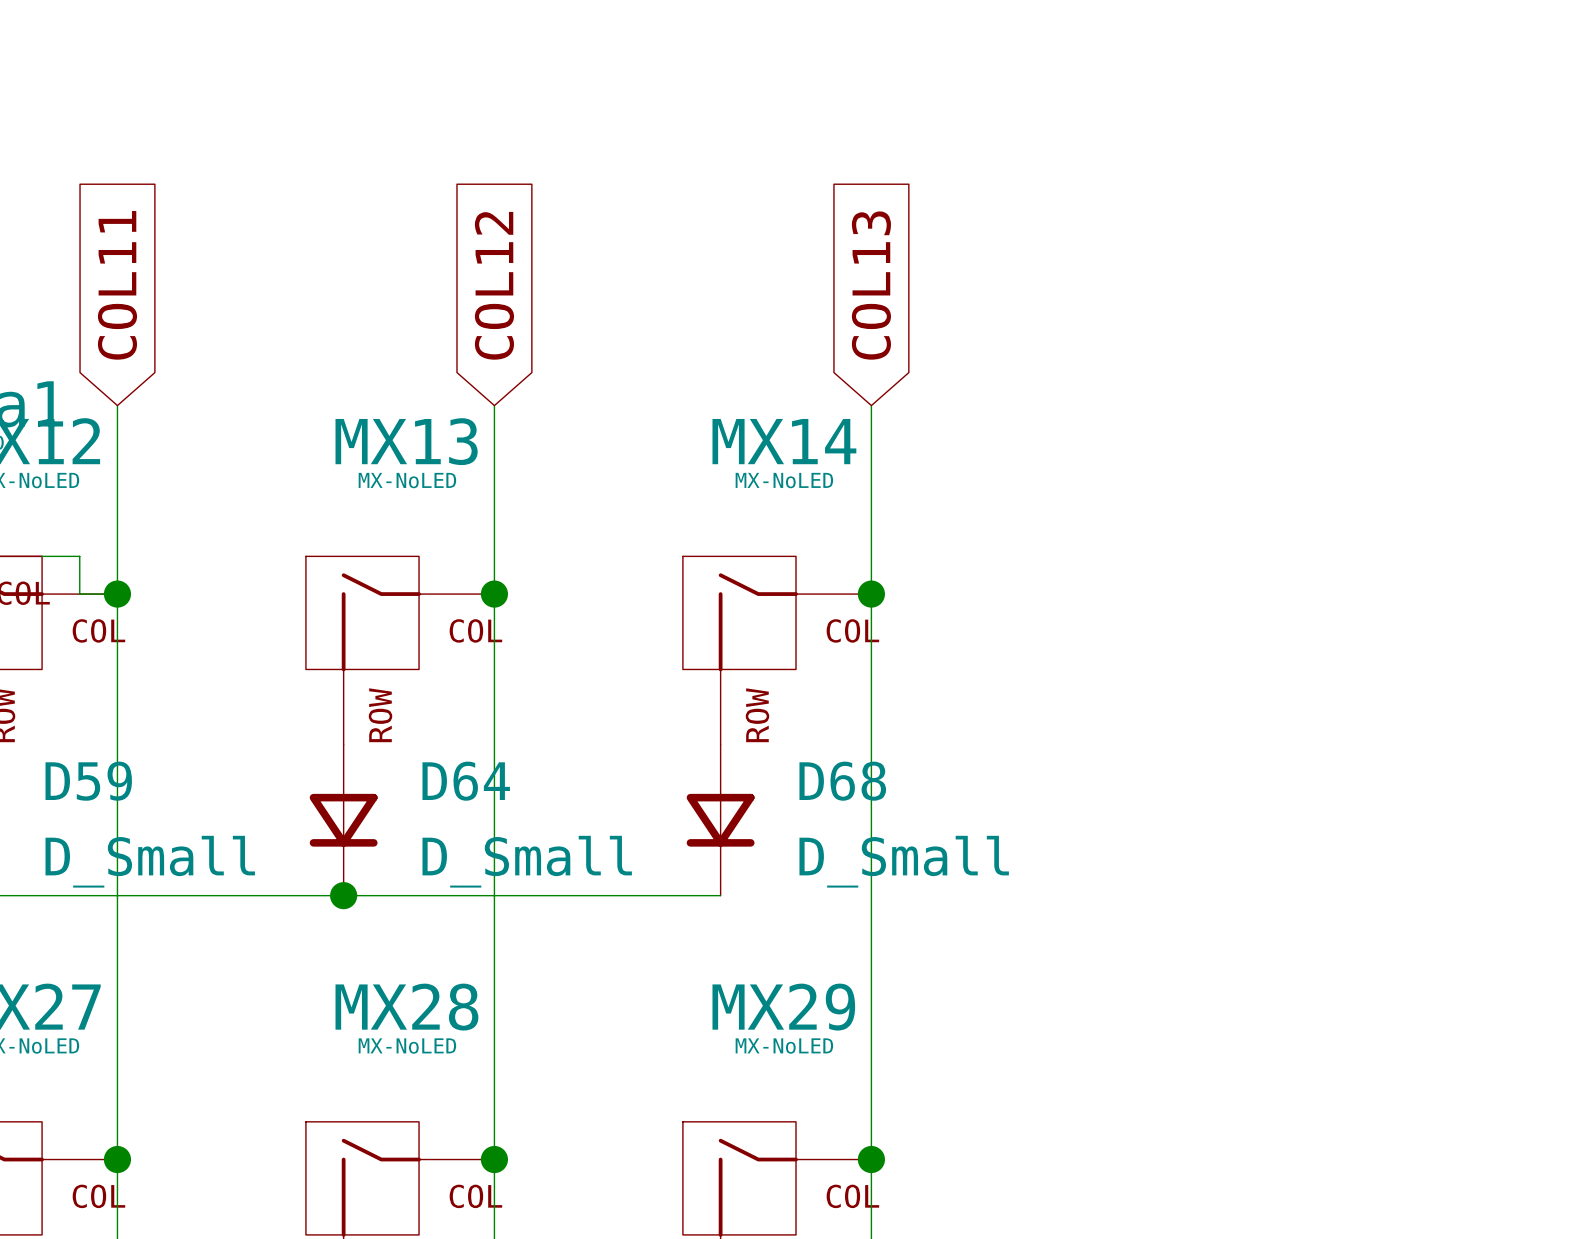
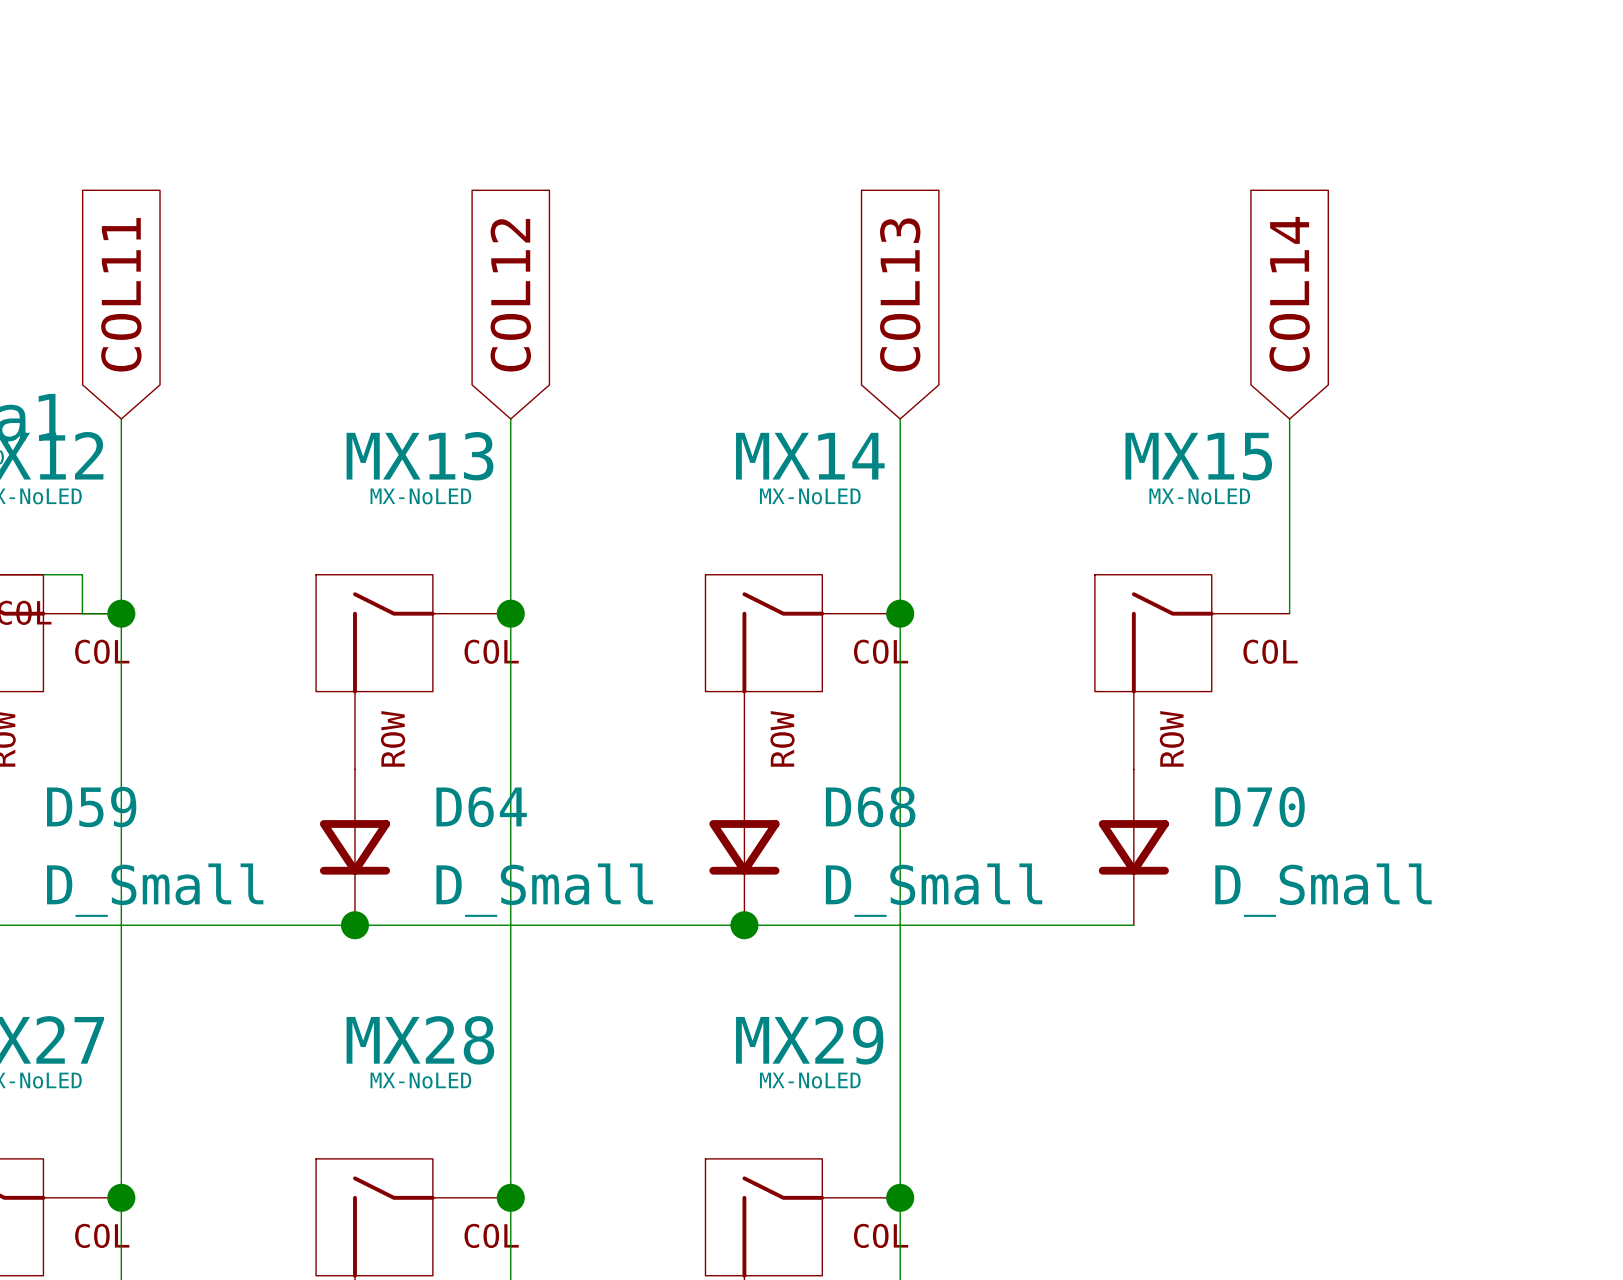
global label: none -> COL14 (1289, 294)
wire: none -> (1289, 418) (1289, 613)
MX15: none -> MX-NoLED (1192, 672)
D70: none -> D_Small (1133, 847)
wire: none -> (744, 925) (1133, 925)
junction: none -> (744, 925)

